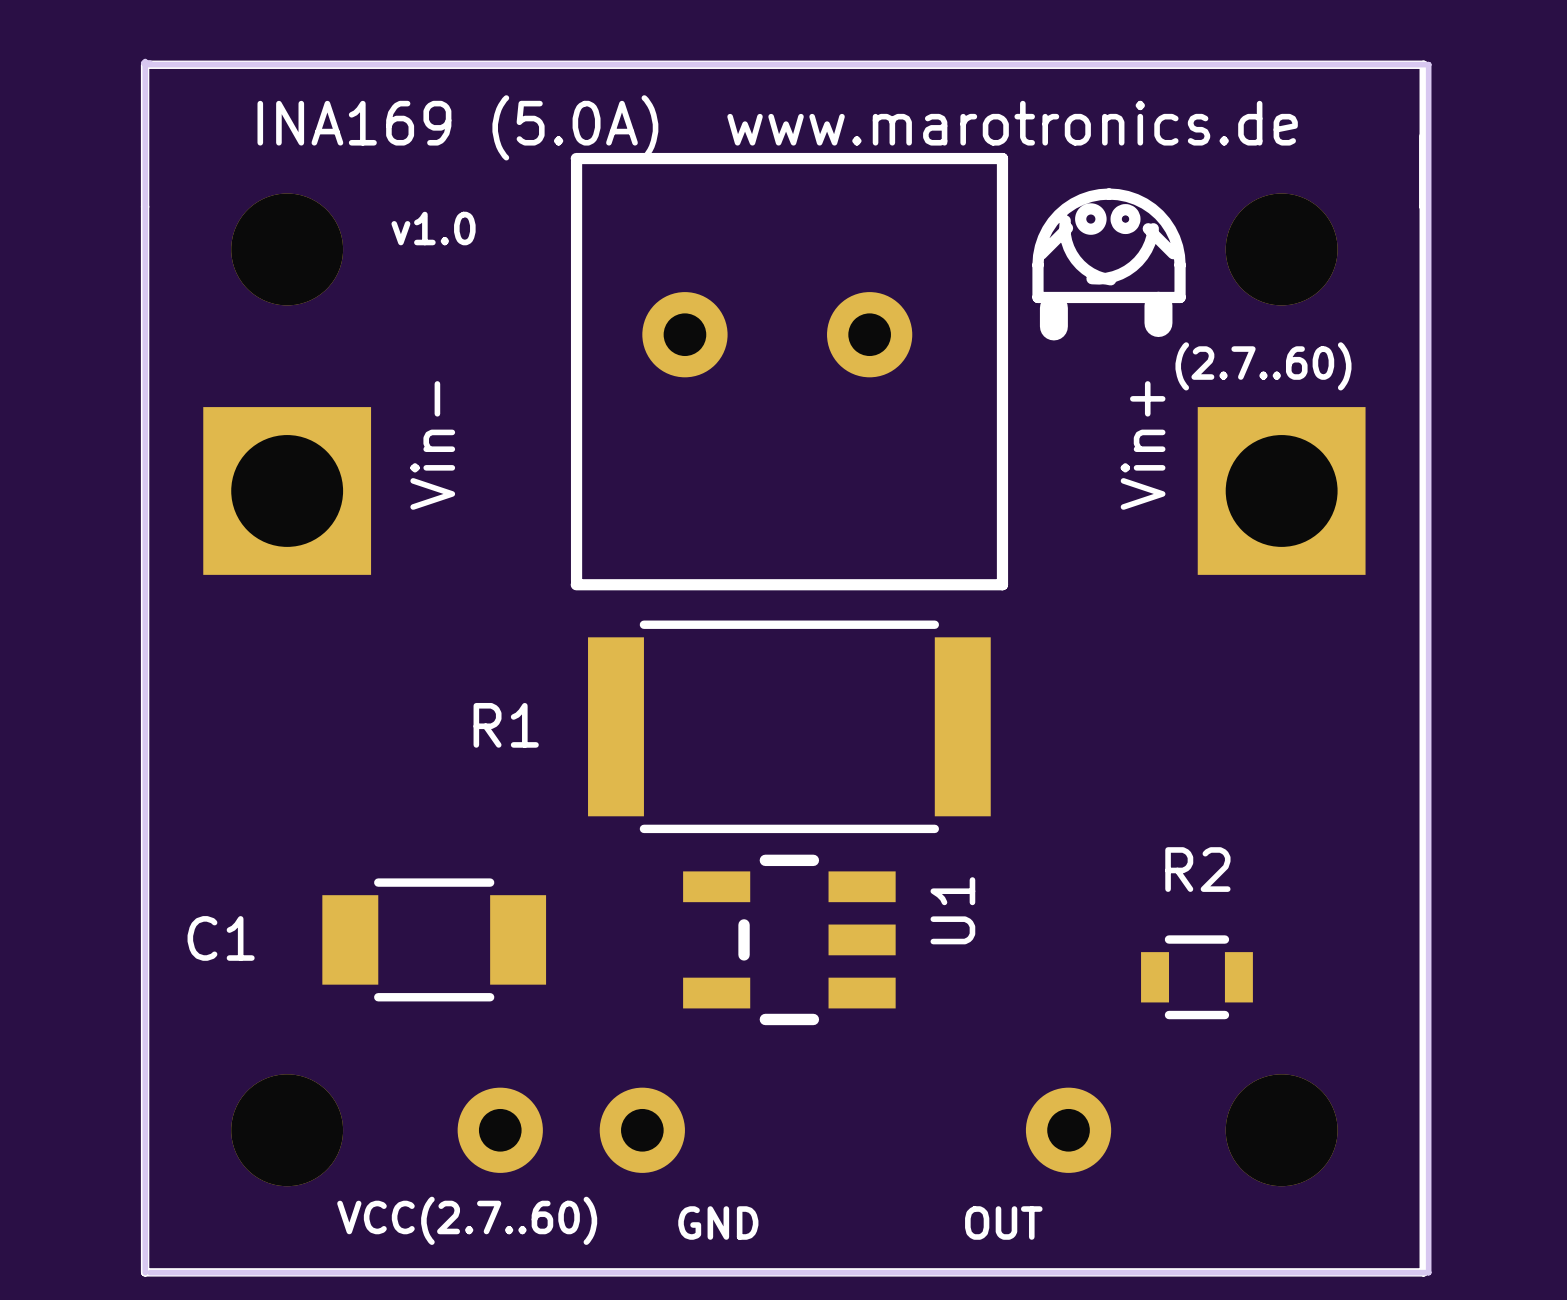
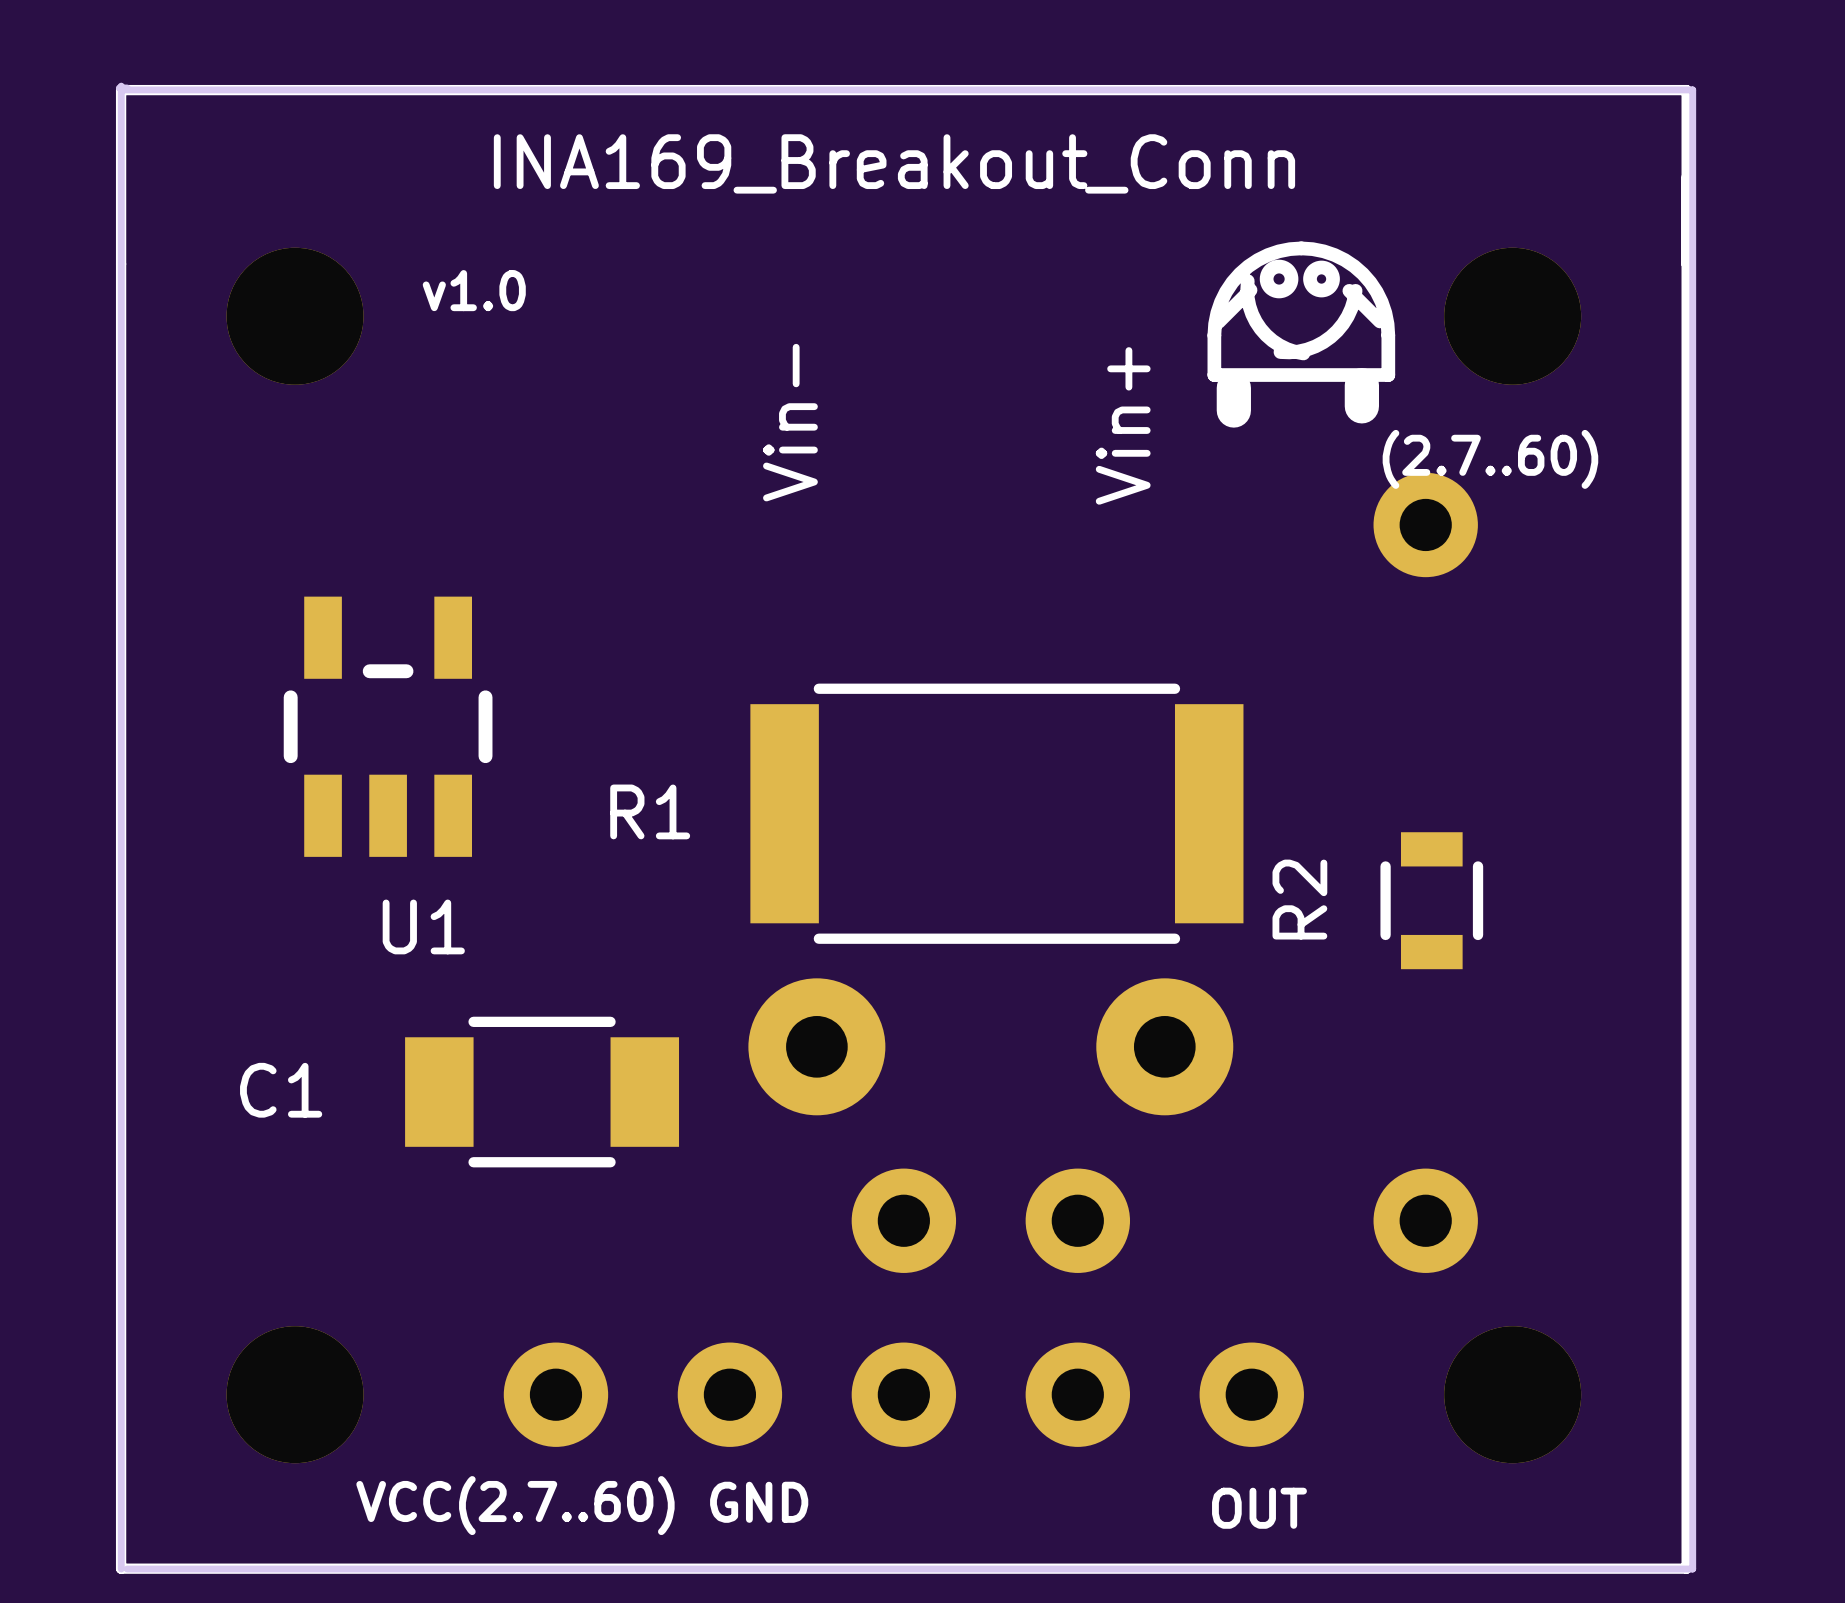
part footprint: [140, 60, 1428, 1277] -> [115, 84, 1692, 1574]
part value: INA169 (5.0A) www.marotronics.de (777, 127) -> INA169_Breakout_Conn (894, 163)
line: (576, 158) (1002, 158) (1002, 584) (576, 584) -> none
line: (576, 161) (576, 580) -> none
text position: Vin- (432, 445) -> Vin- (790, 422)
text position: Vin+ (1143, 445) -> Vin+ (1123, 425)
R1 position: (789, 726) -> (996, 813)
R2 name position: R2 (1197, 869) -> R2 (1299, 899)
C1 position: (434, 939) -> (542, 1092)
U1 rotation: 0° (789, 939) -> 90° clockwise (388, 726)
U1 position: (789, 939) -> (388, 726)
R2 rotation: 0° (1196, 977) -> 90° clockwise (1431, 900)
R2 position: (1196, 977) -> (1431, 900)
text position: GND (718, 1223) -> GND (759, 1502)
text position: OUT (1003, 1223) -> OUT (1259, 1508)

